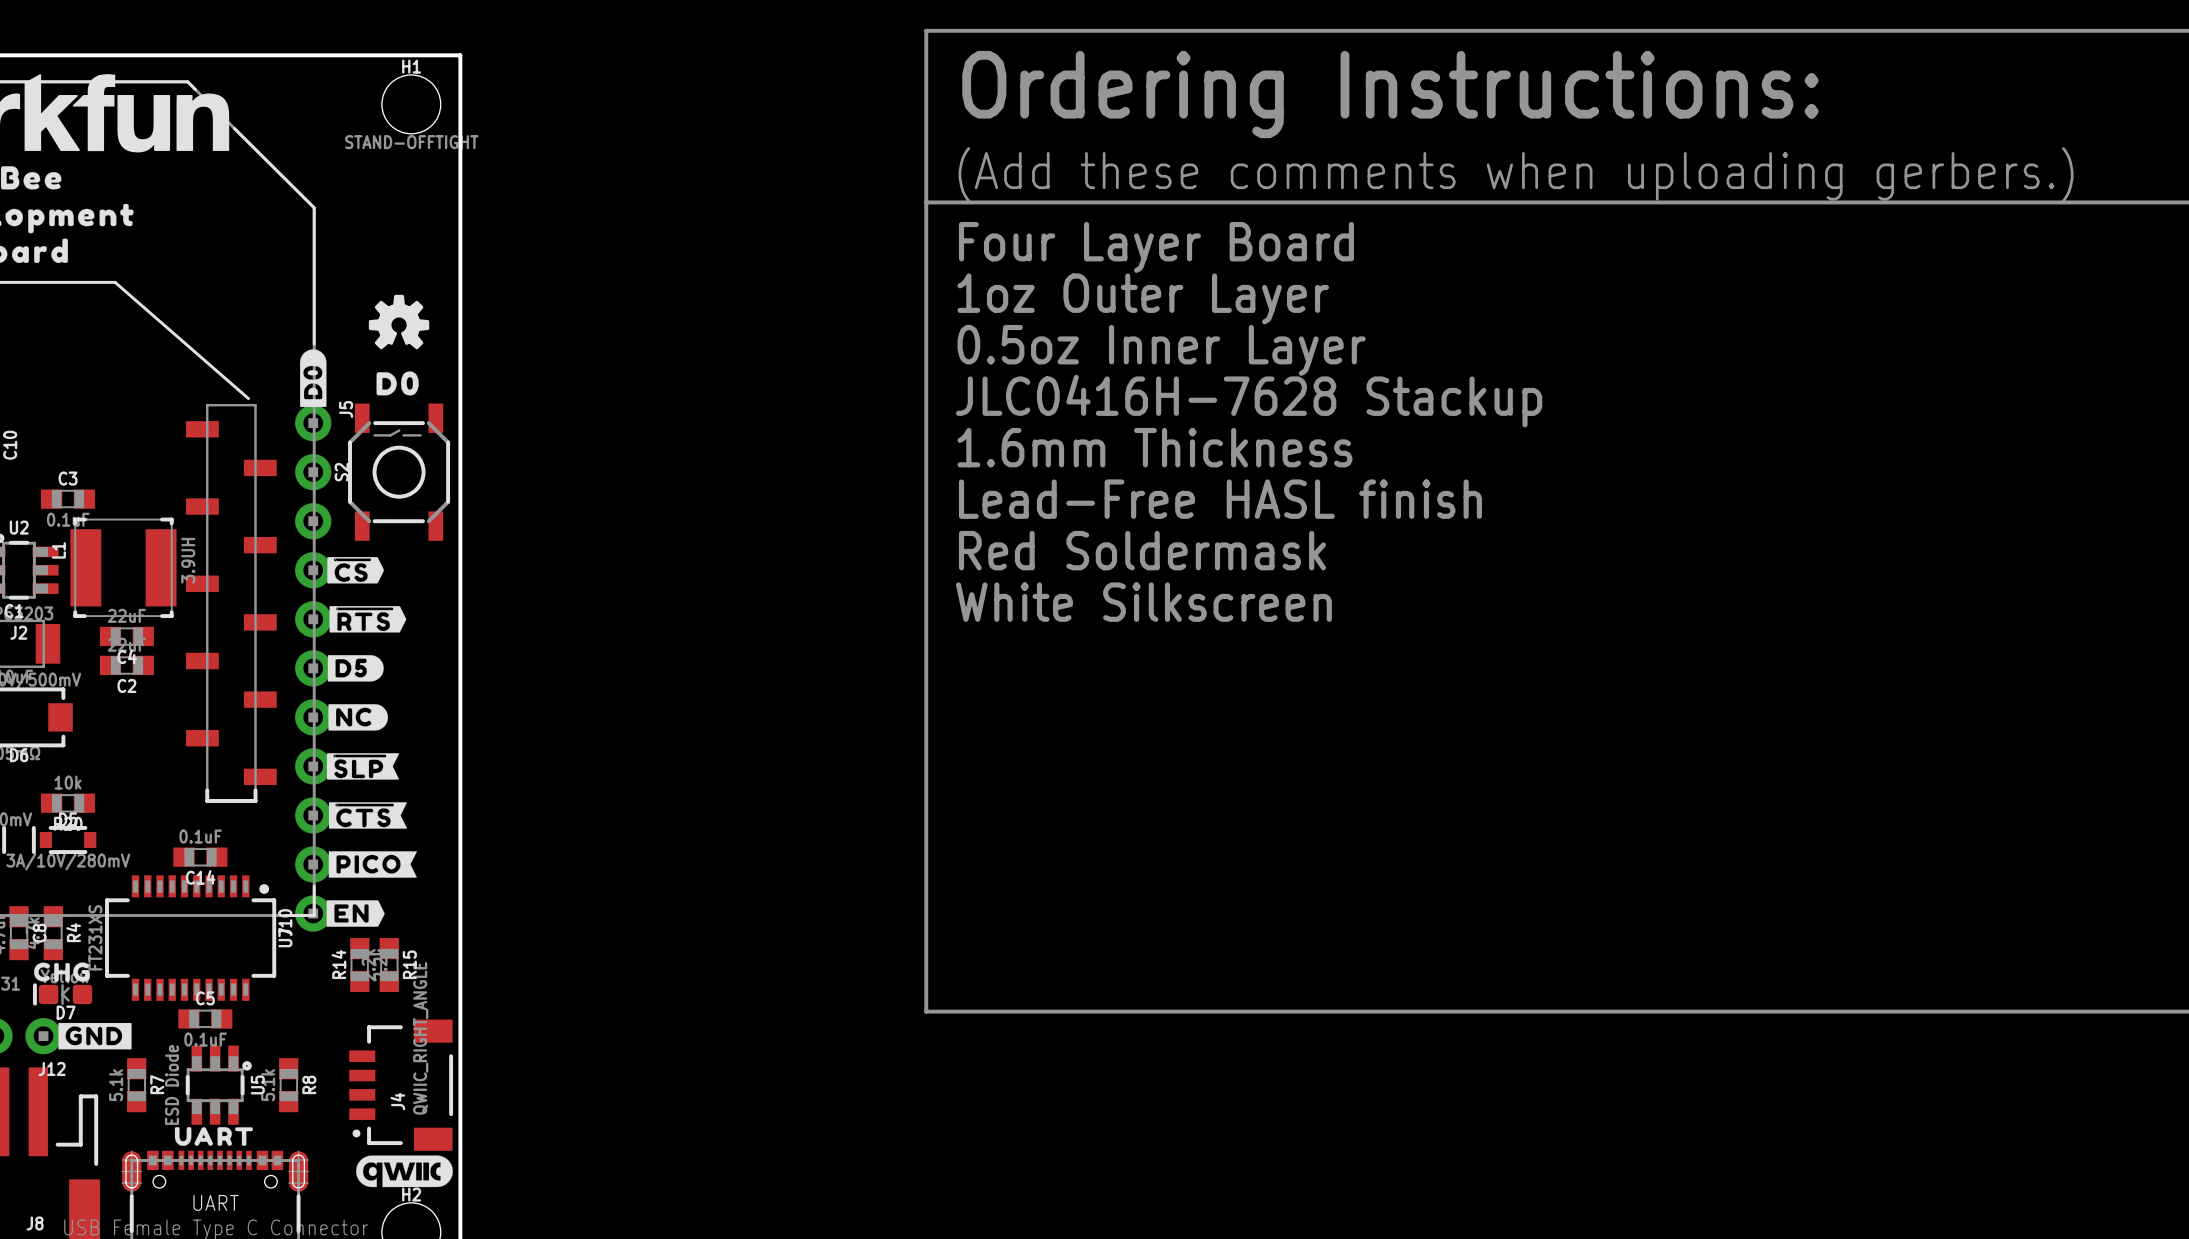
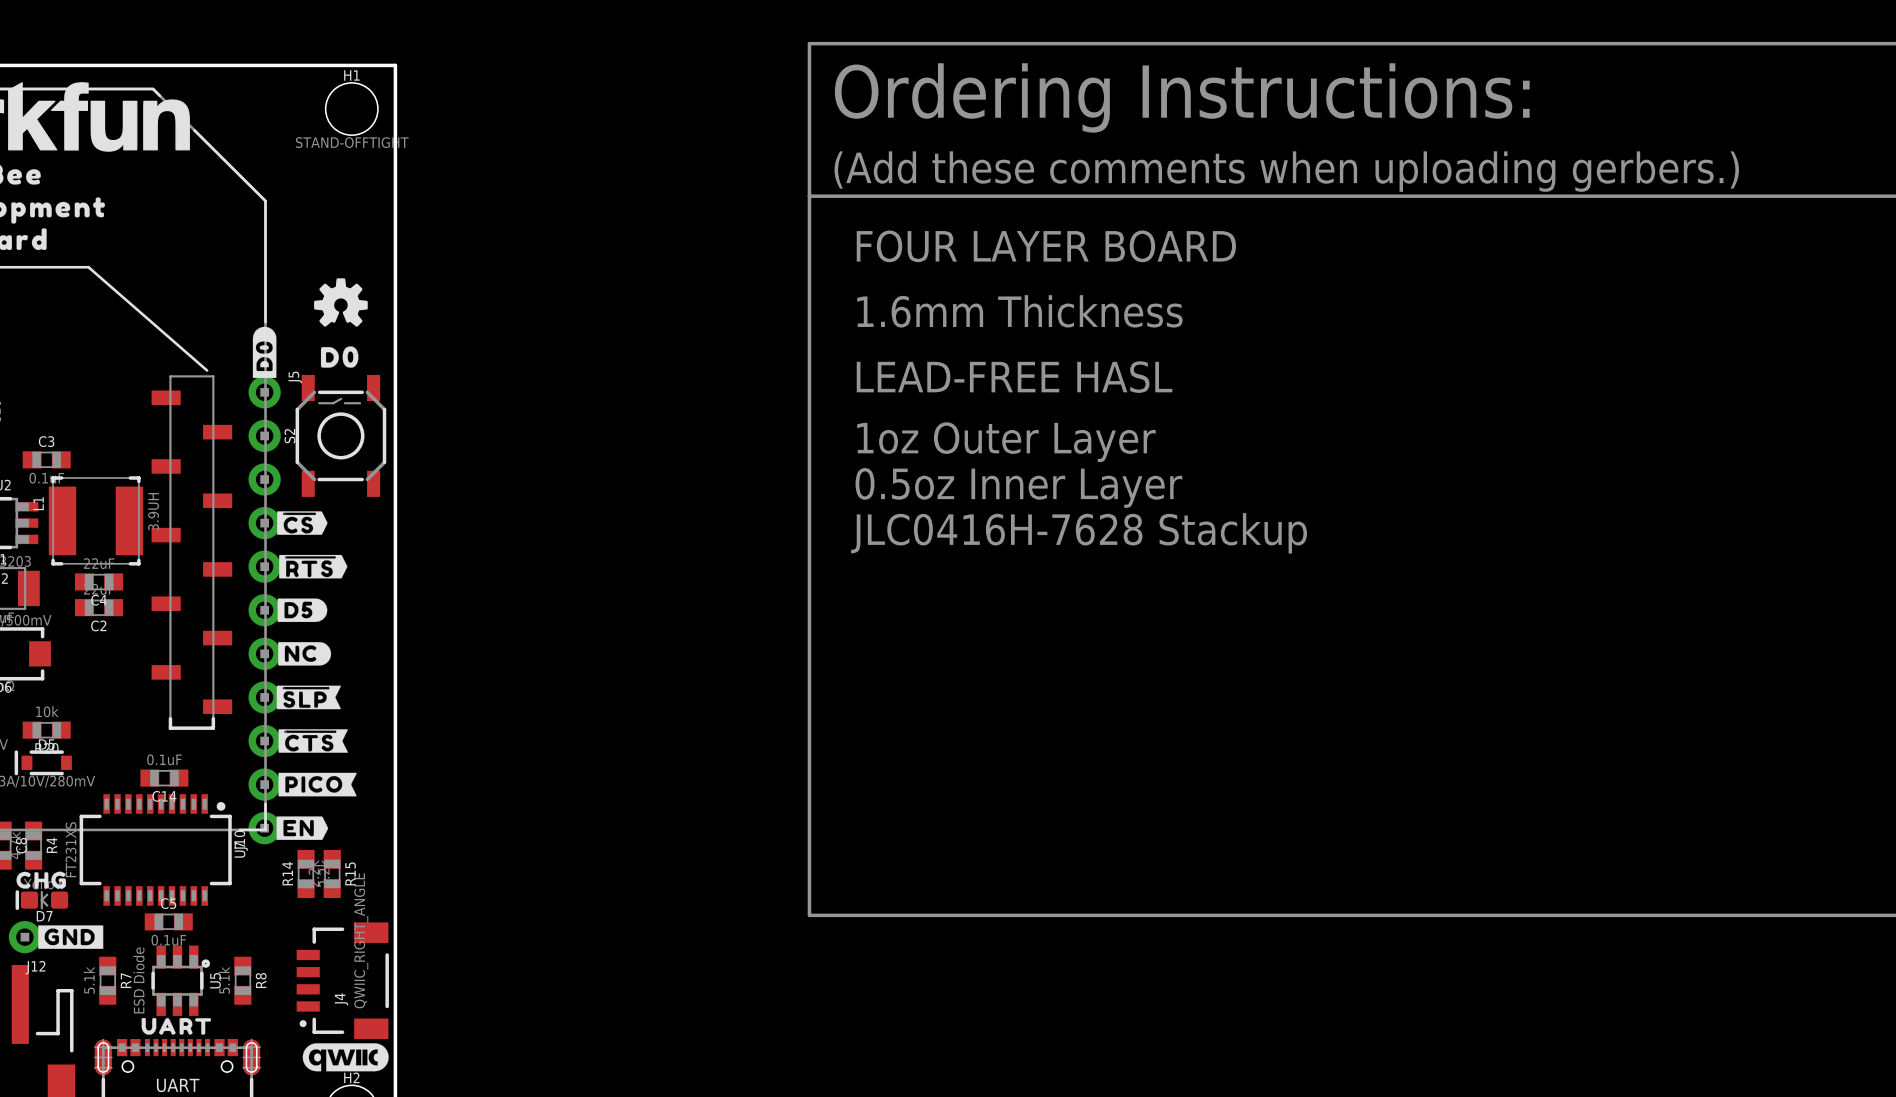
text: Four Layer Board (1156, 247) -> none
text: none -> FOUR LAYER BOARD (1046, 246)
text position: 1oz Outer Layer (1143, 298) -> 1oz Outer Layer (1006, 442)
text position: 0.5oz Inner Layer (1161, 350) -> 0.5oz Inner Layer (1018, 487)
text position: JLC0416H-7628 Stackup (1249, 401) -> JLC0416H-7628 Stackup (1079, 533)
text: none -> LEAD-FREE HASL (1014, 377)
text position: 1.6mm Thickness (1154, 447) -> 1.6mm Thickness (1019, 311)
text: Lead-Free HASL finish (1220, 499) -> none
text: Red Soldermask (1142, 550) -> none
text: White Silkscreen (1143, 602) -> none

